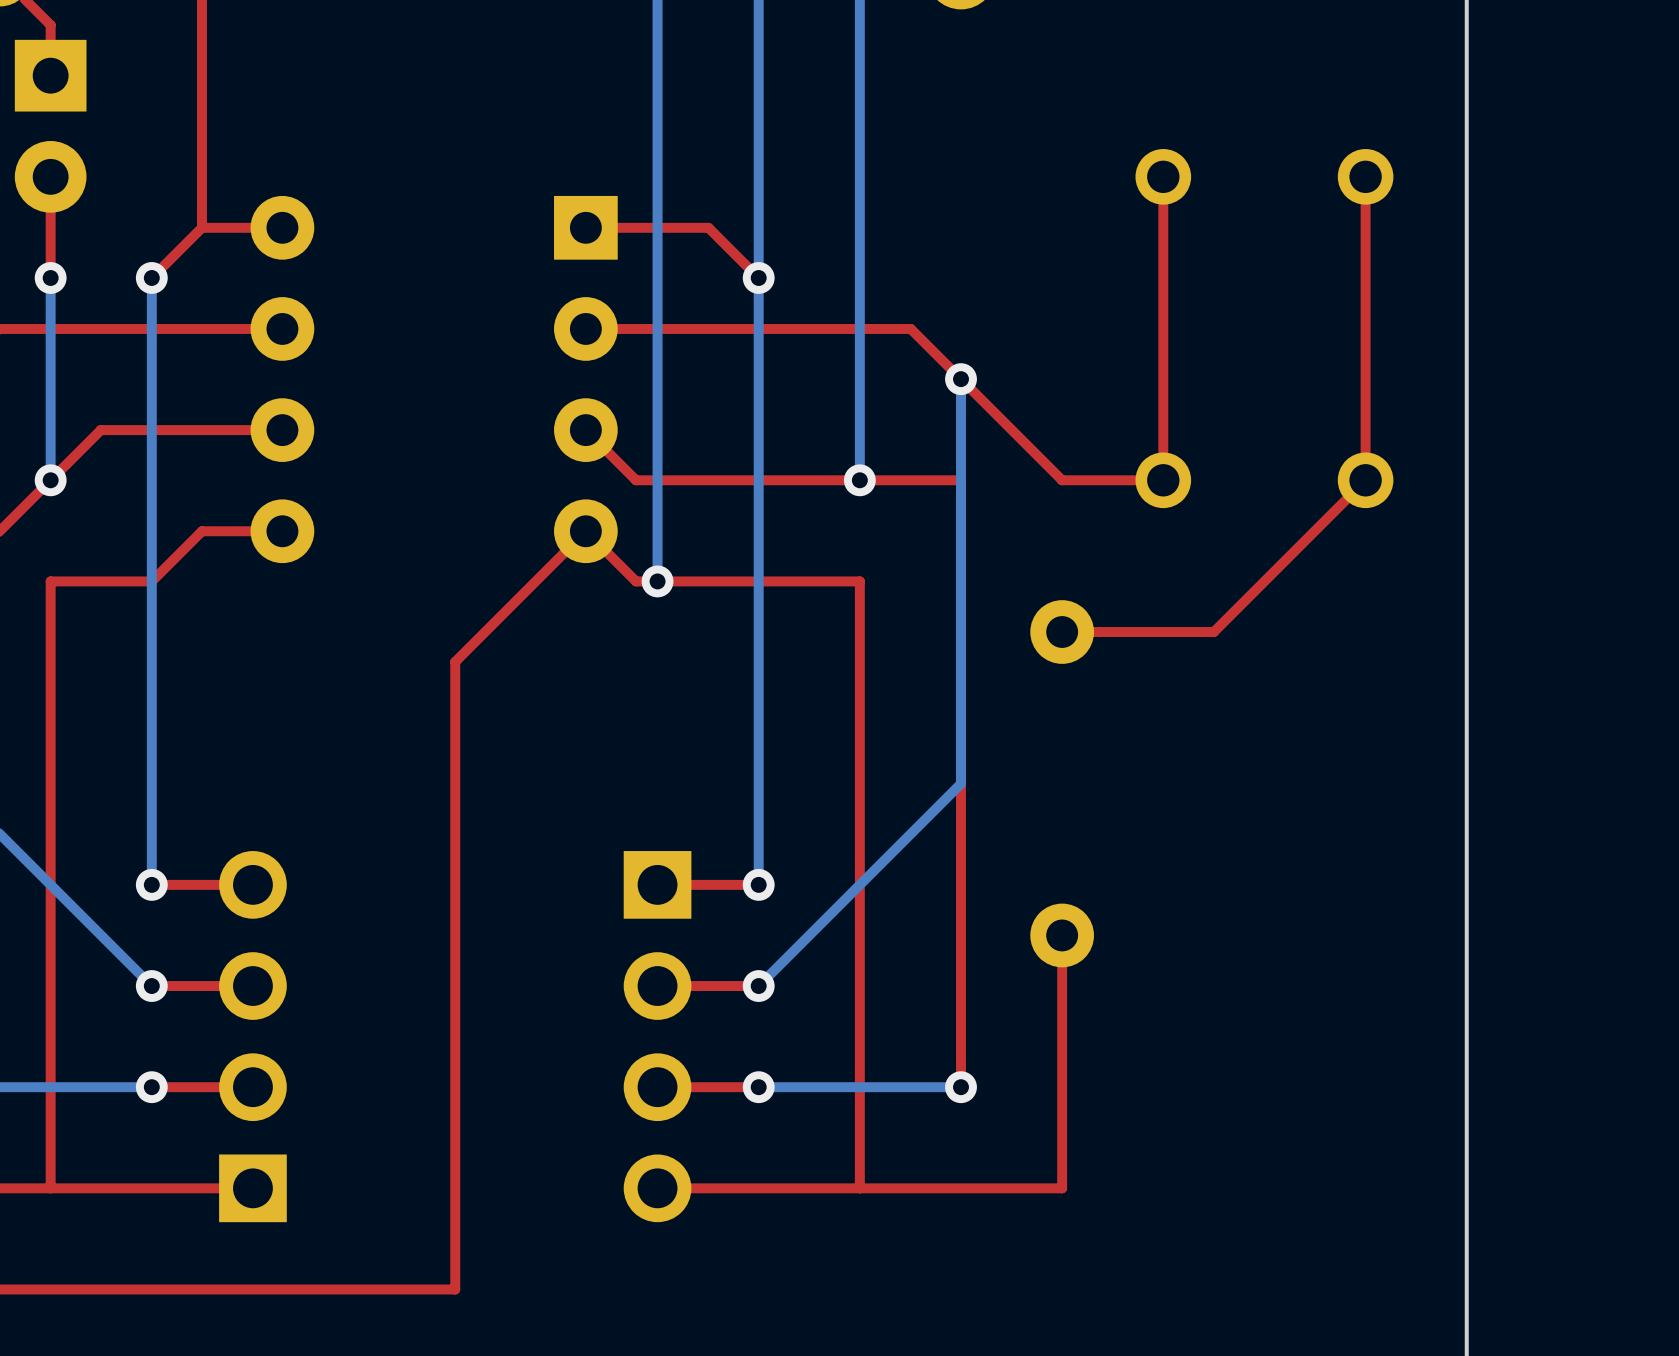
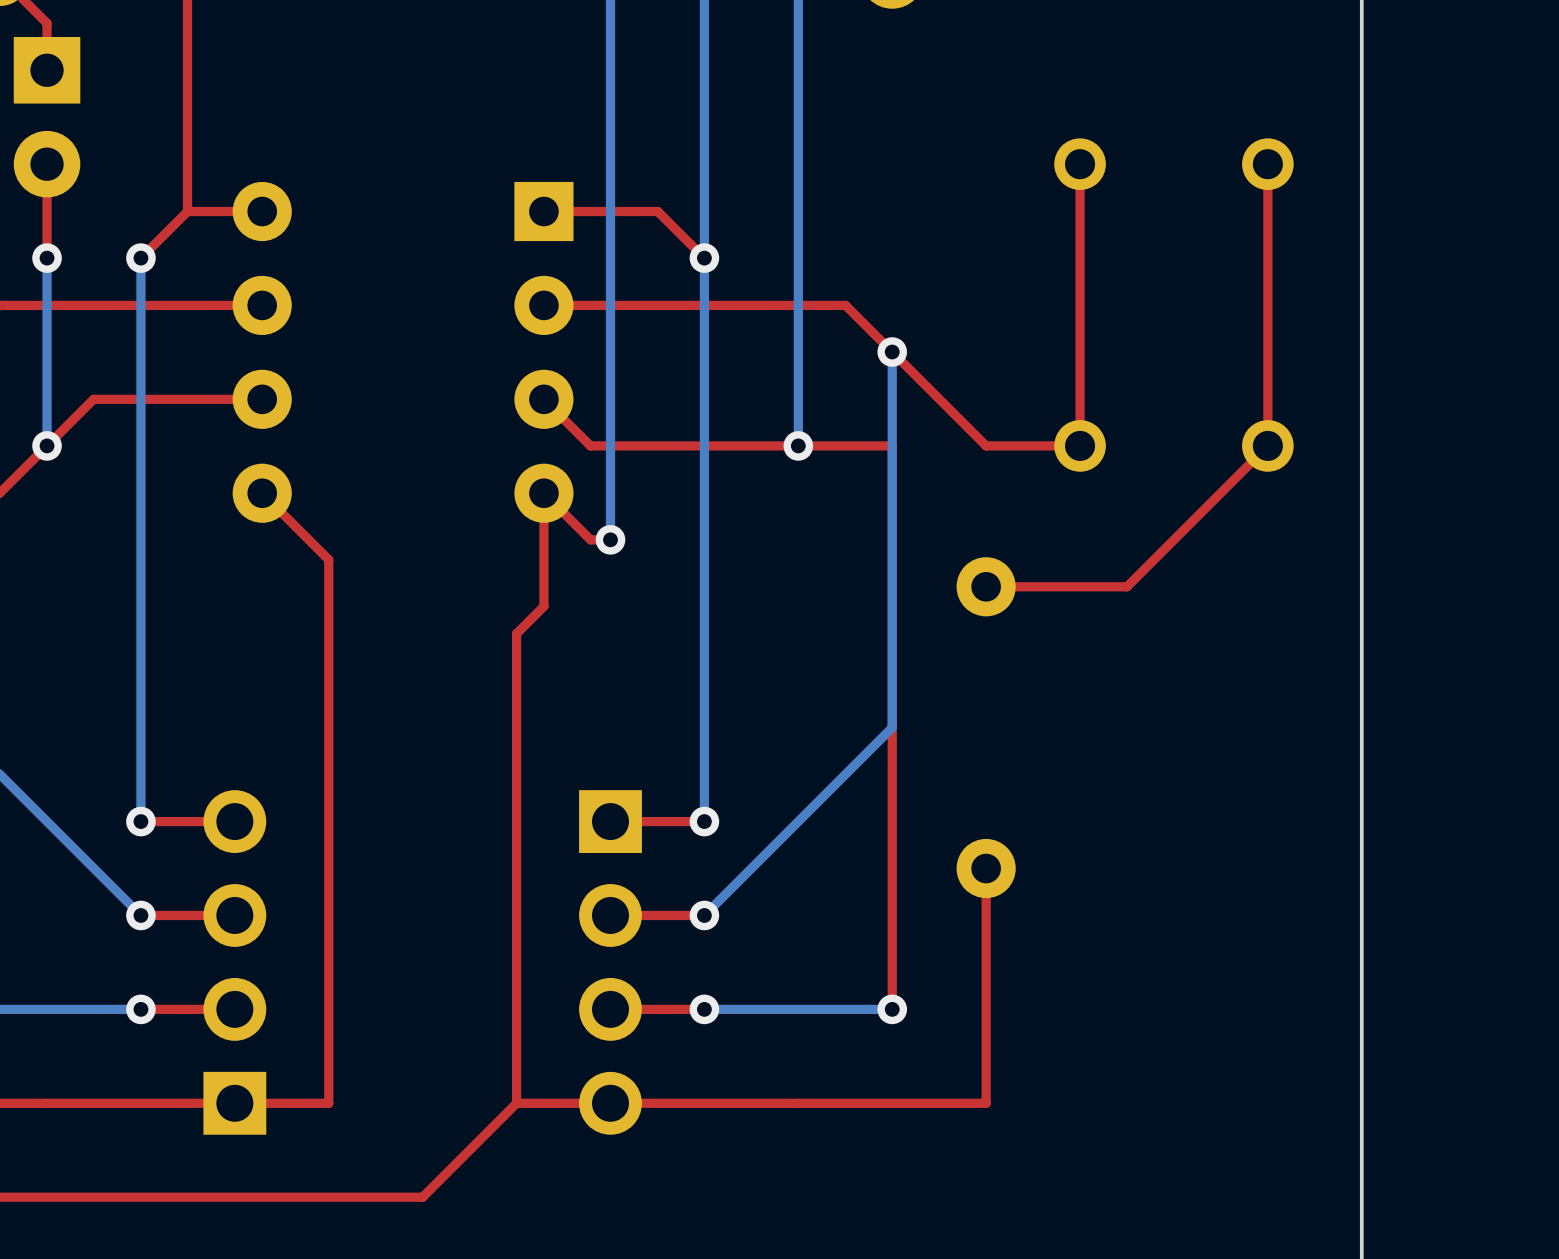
top track: (282, 531) (201, 531) (151, 581) (50, 581) (50, 1188) -> (262, 493) (328, 559) (328, 1103) (234, 1103)
top track: (585, 531) (455, 661) (455, 1289) -> (543, 493) (543, 606) (516, 633) (516, 1103)
top track: (657, 581) (859, 581) (859, 1188) -> none
top track: none -> (516, 1103) (422, 1197)
top track: none -> (610, 1103) (516, 1103)

